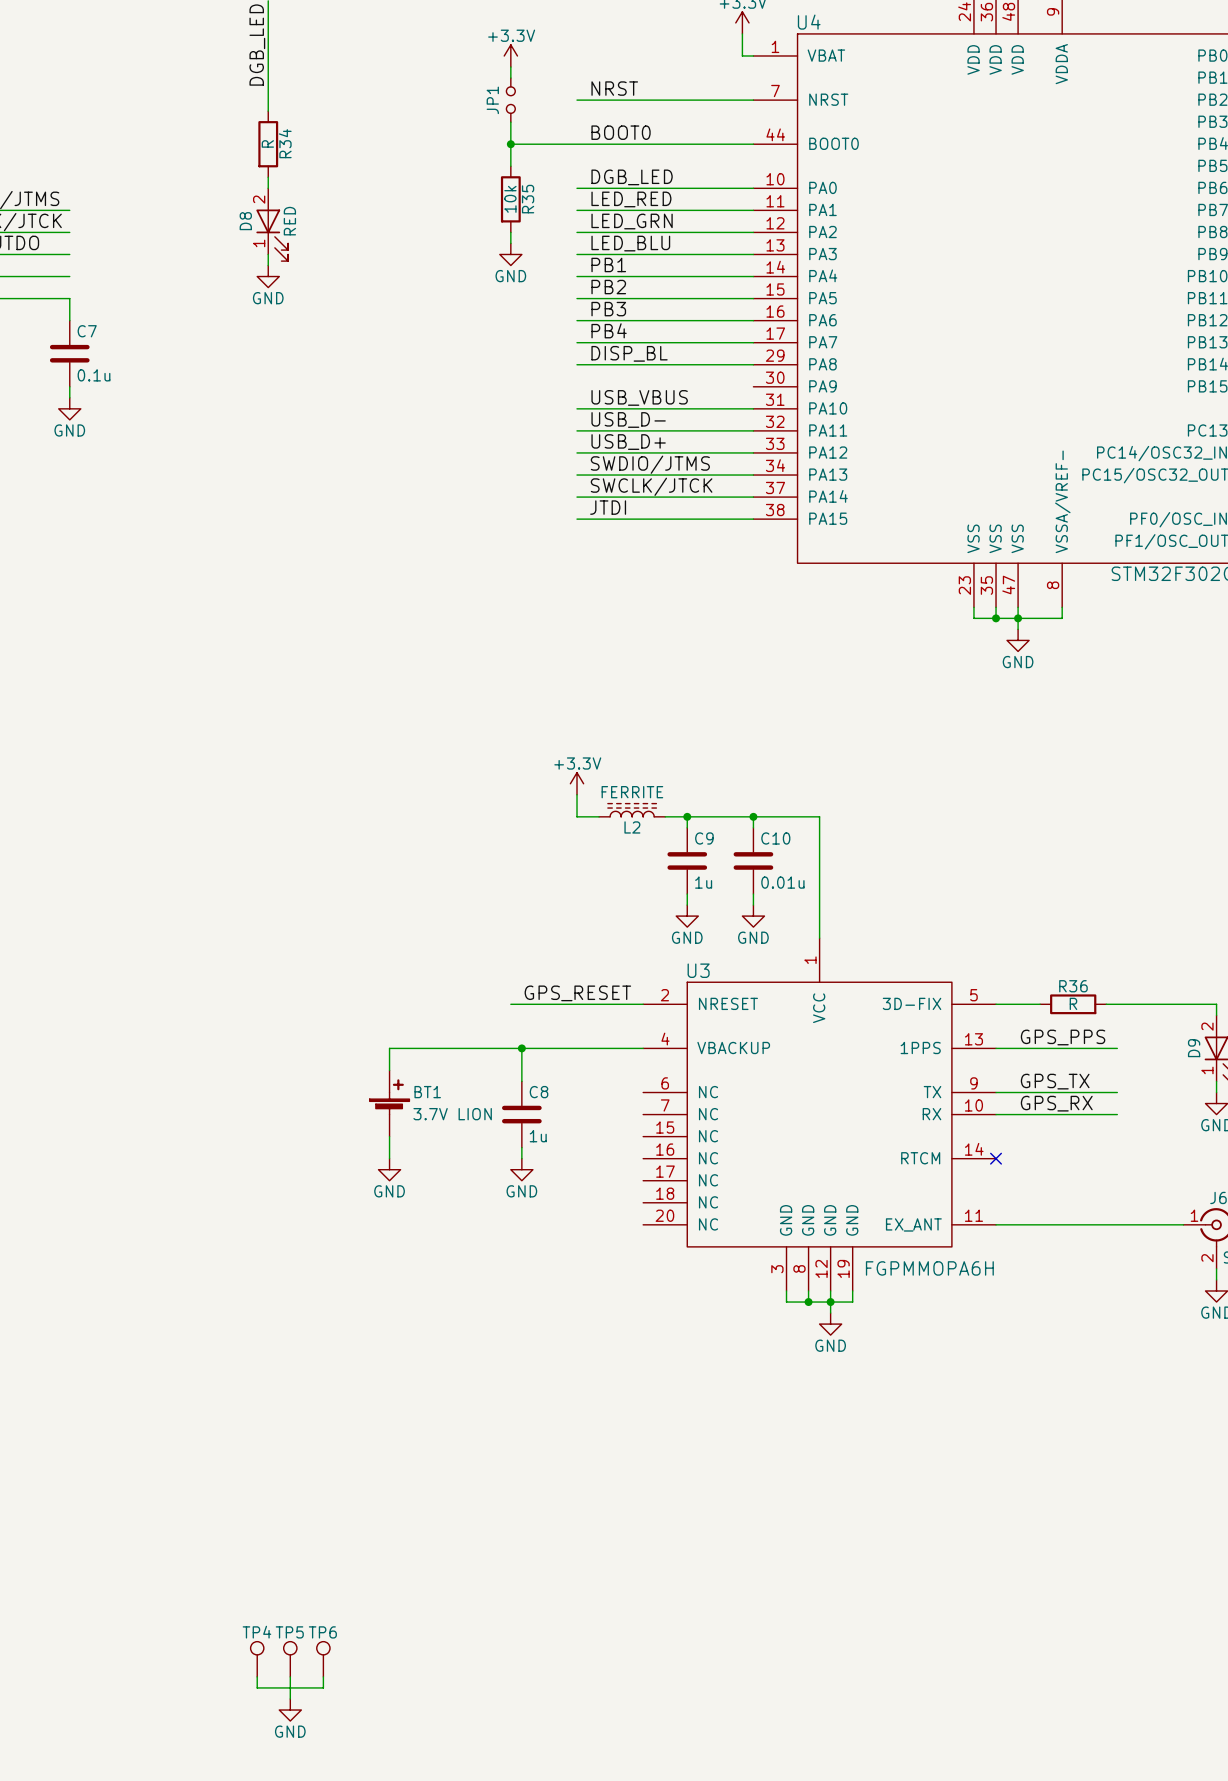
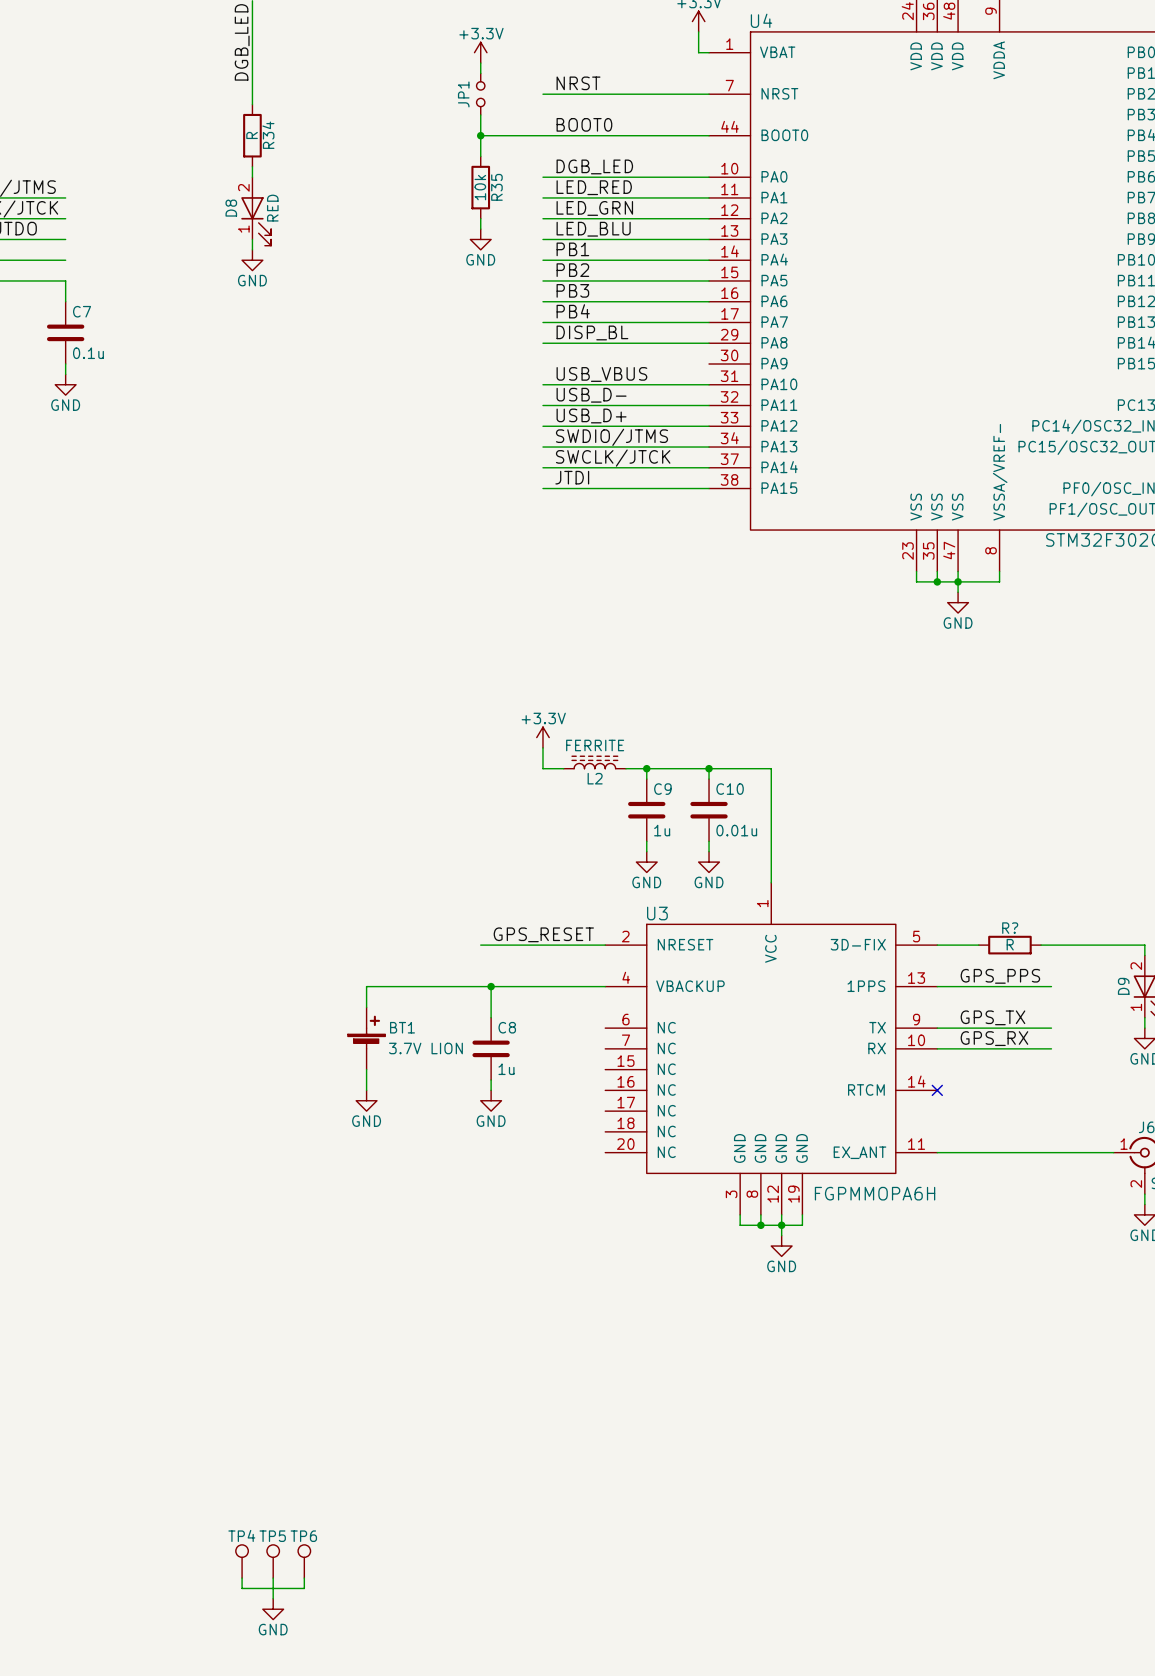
R36 name: R36 (1073, 986) -> R? (1010, 928)

